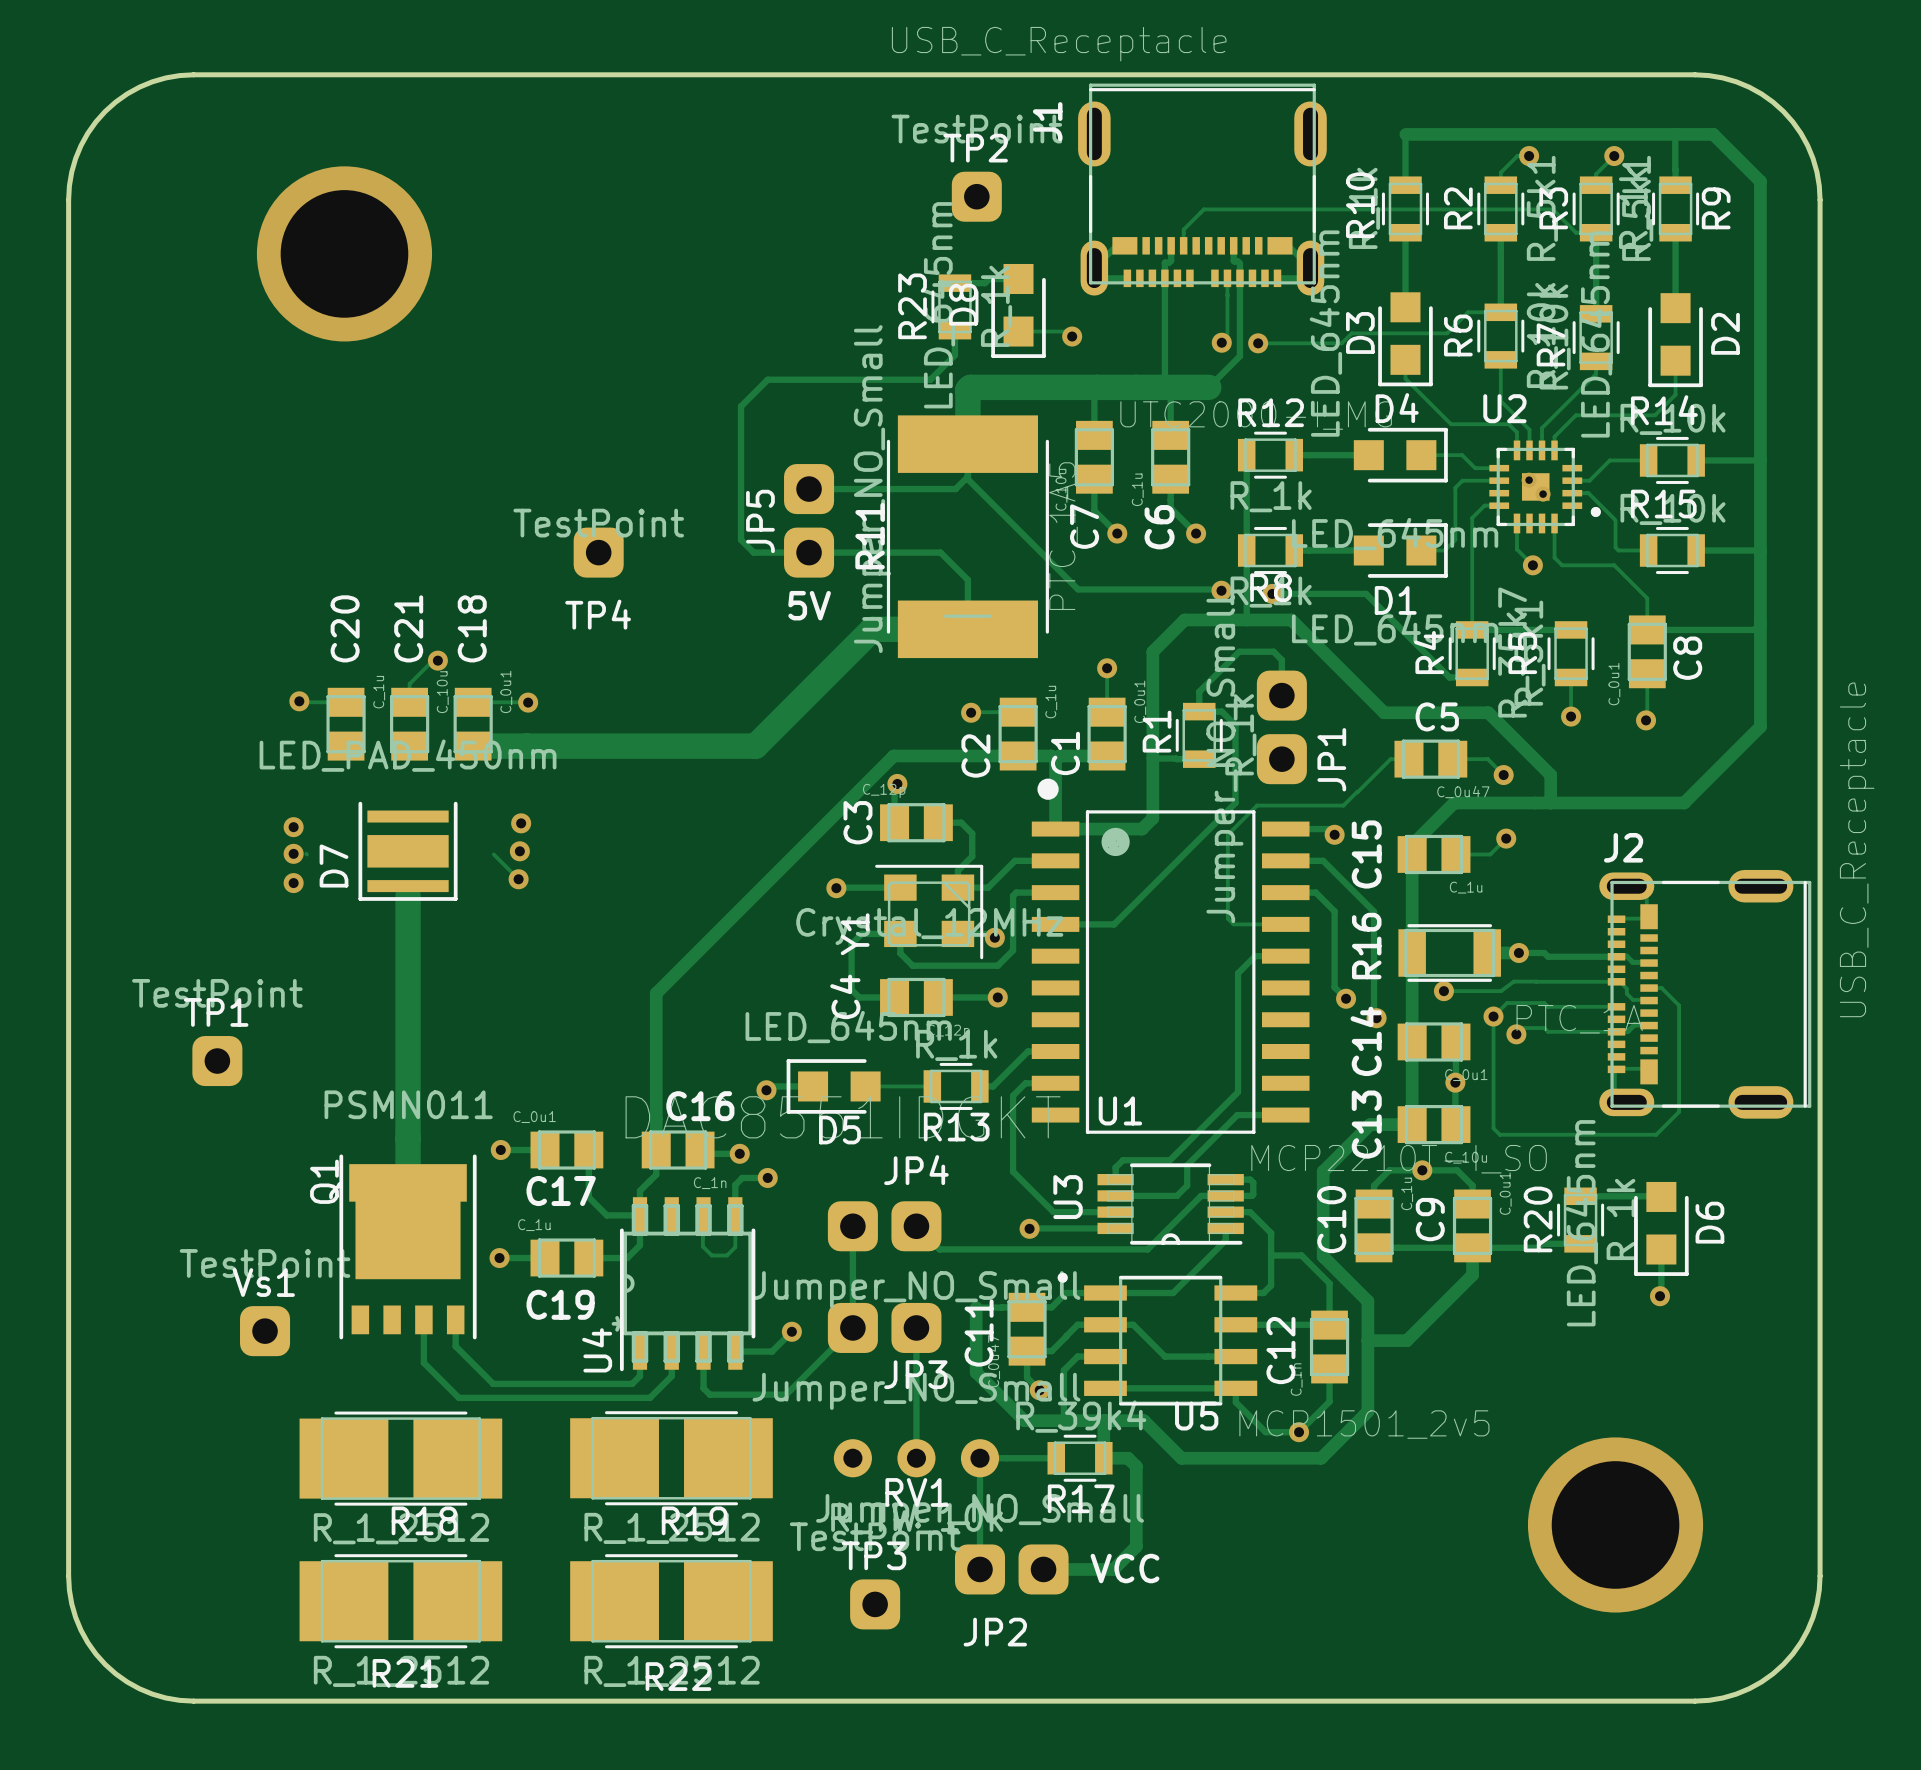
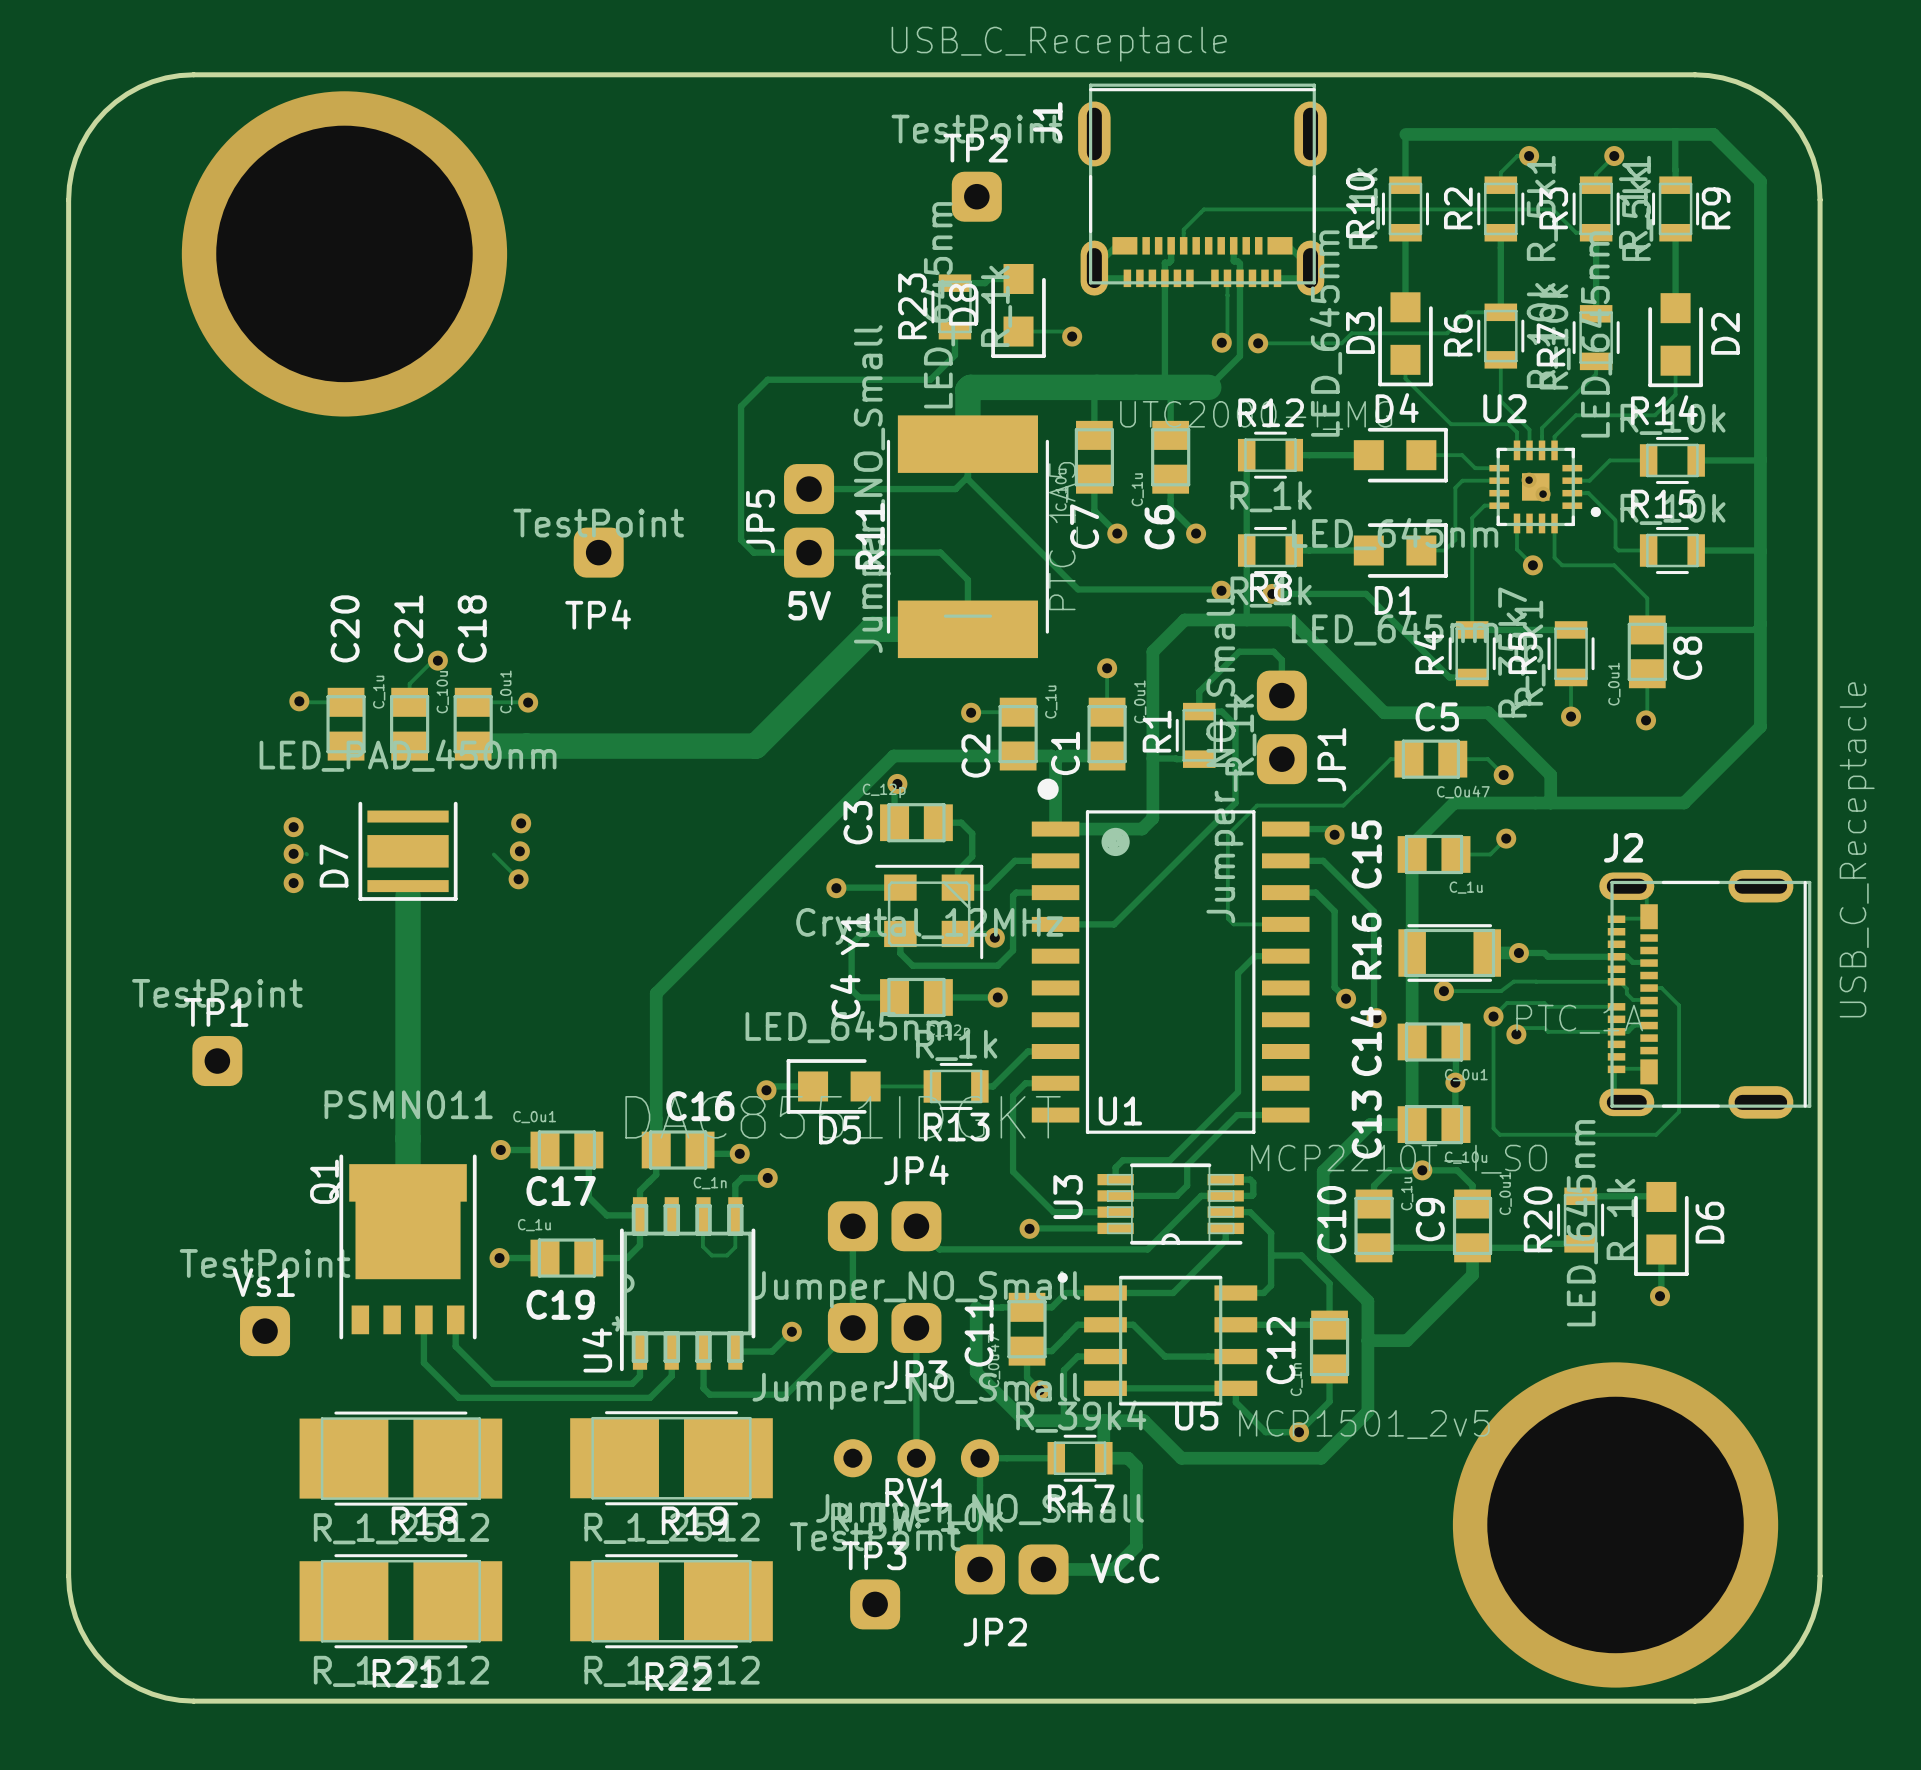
via size: [256, 166, 433, 342] -> [181, 91, 508, 417]
via size: [1527, 1437, 1704, 1613] -> [1452, 1362, 1779, 1688]

